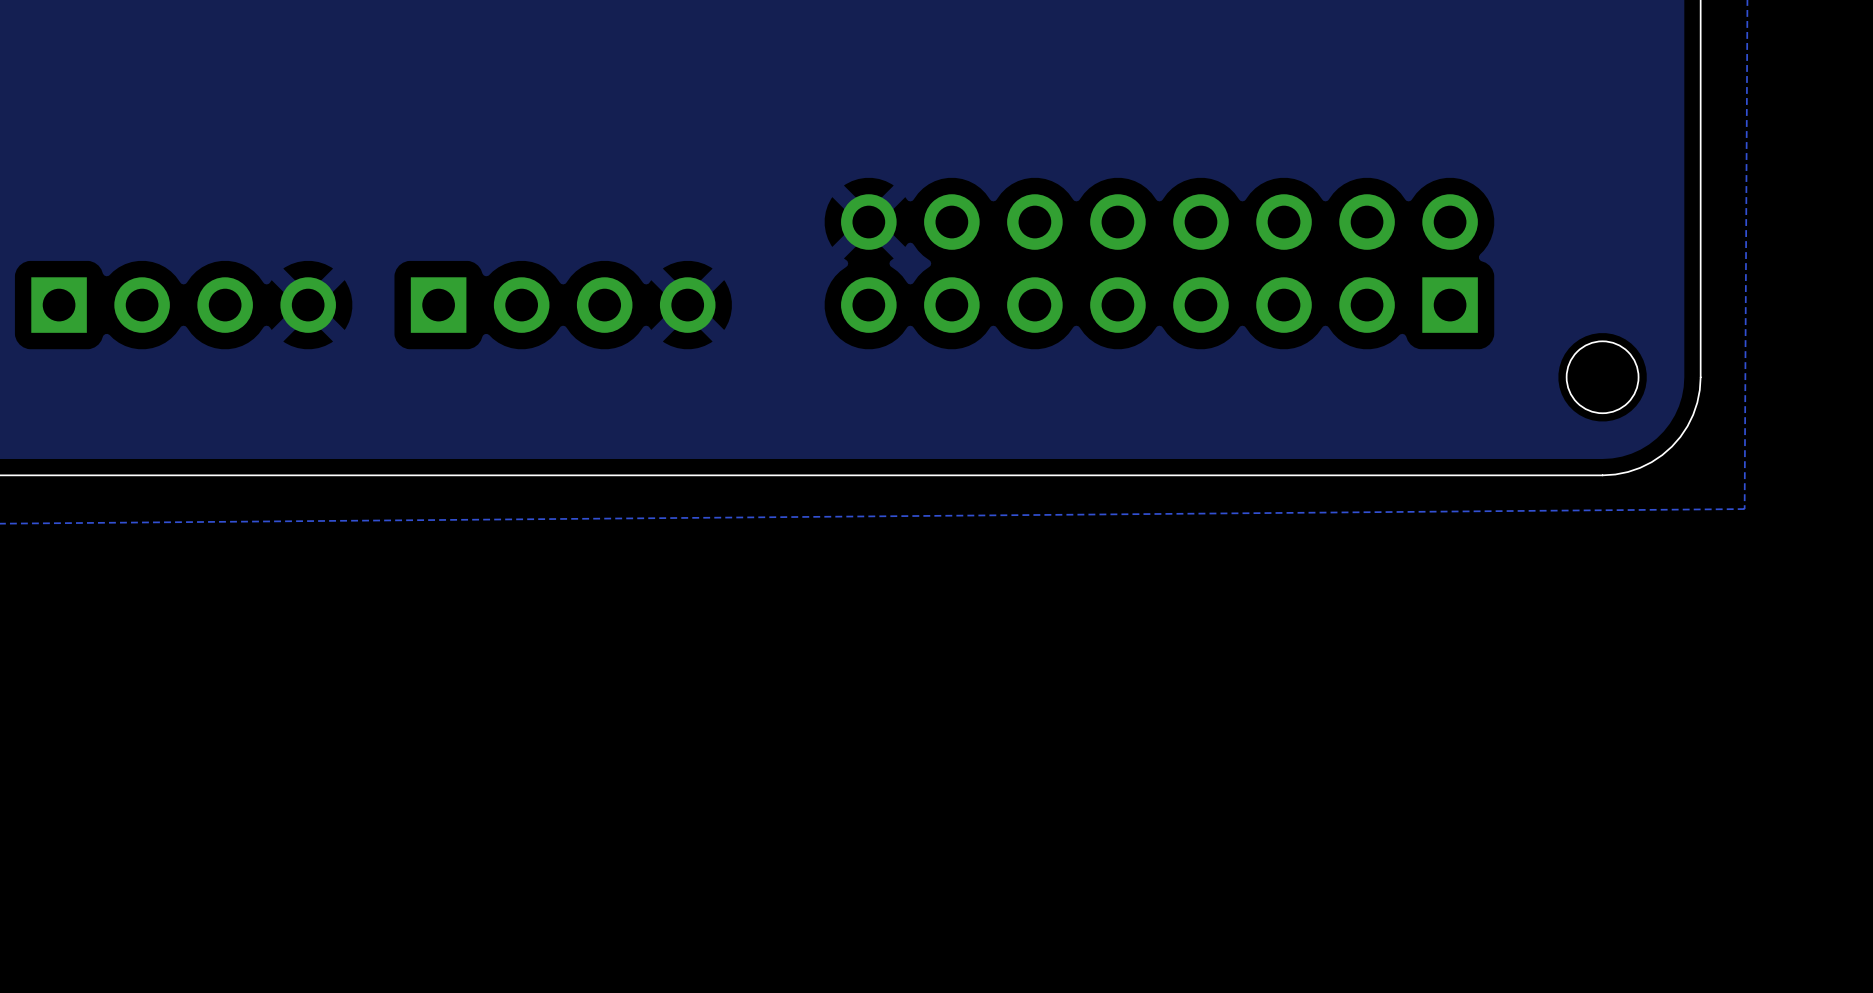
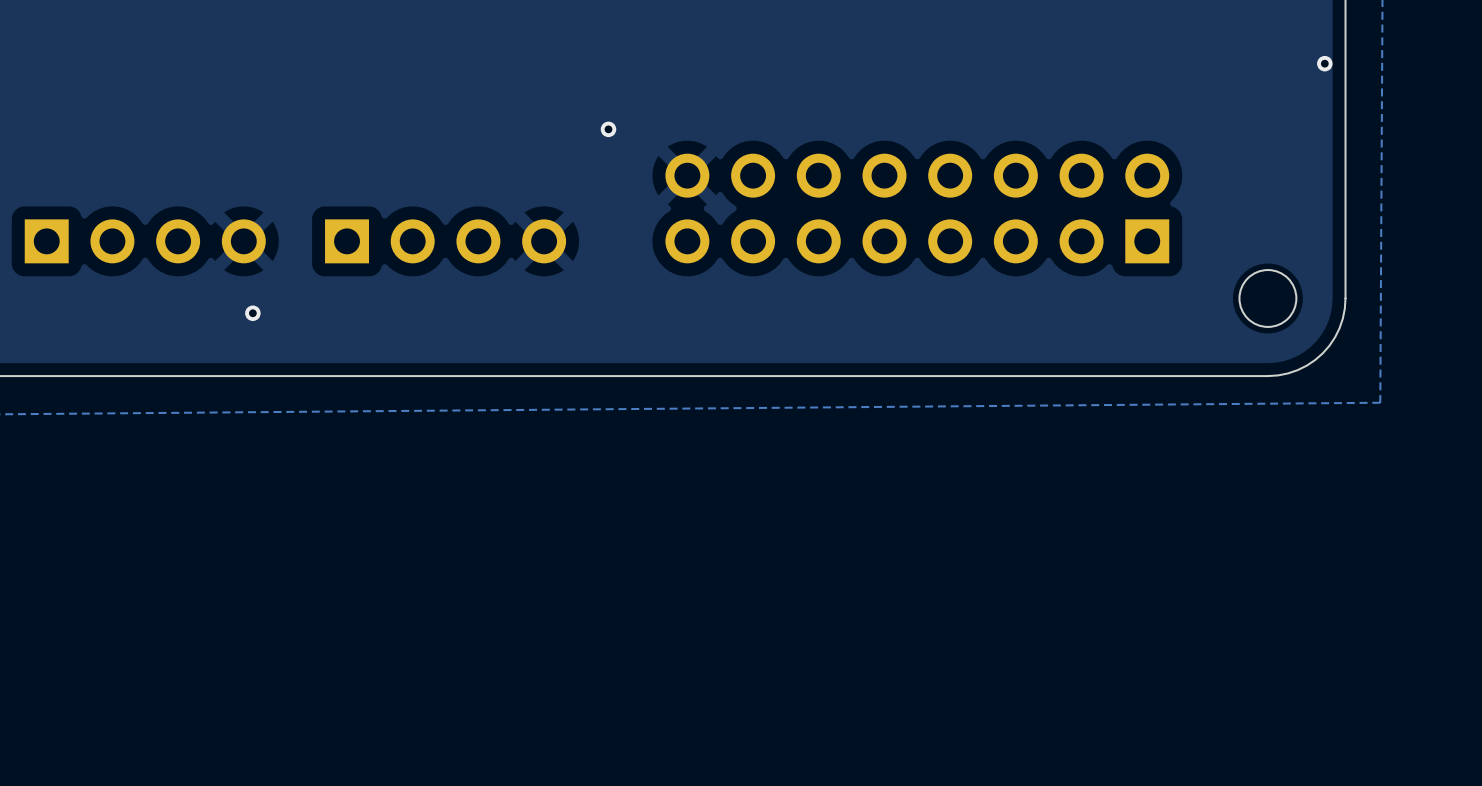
via: none -> (1324, 63)
via: none -> (608, 129)
via: none -> (252, 313)

